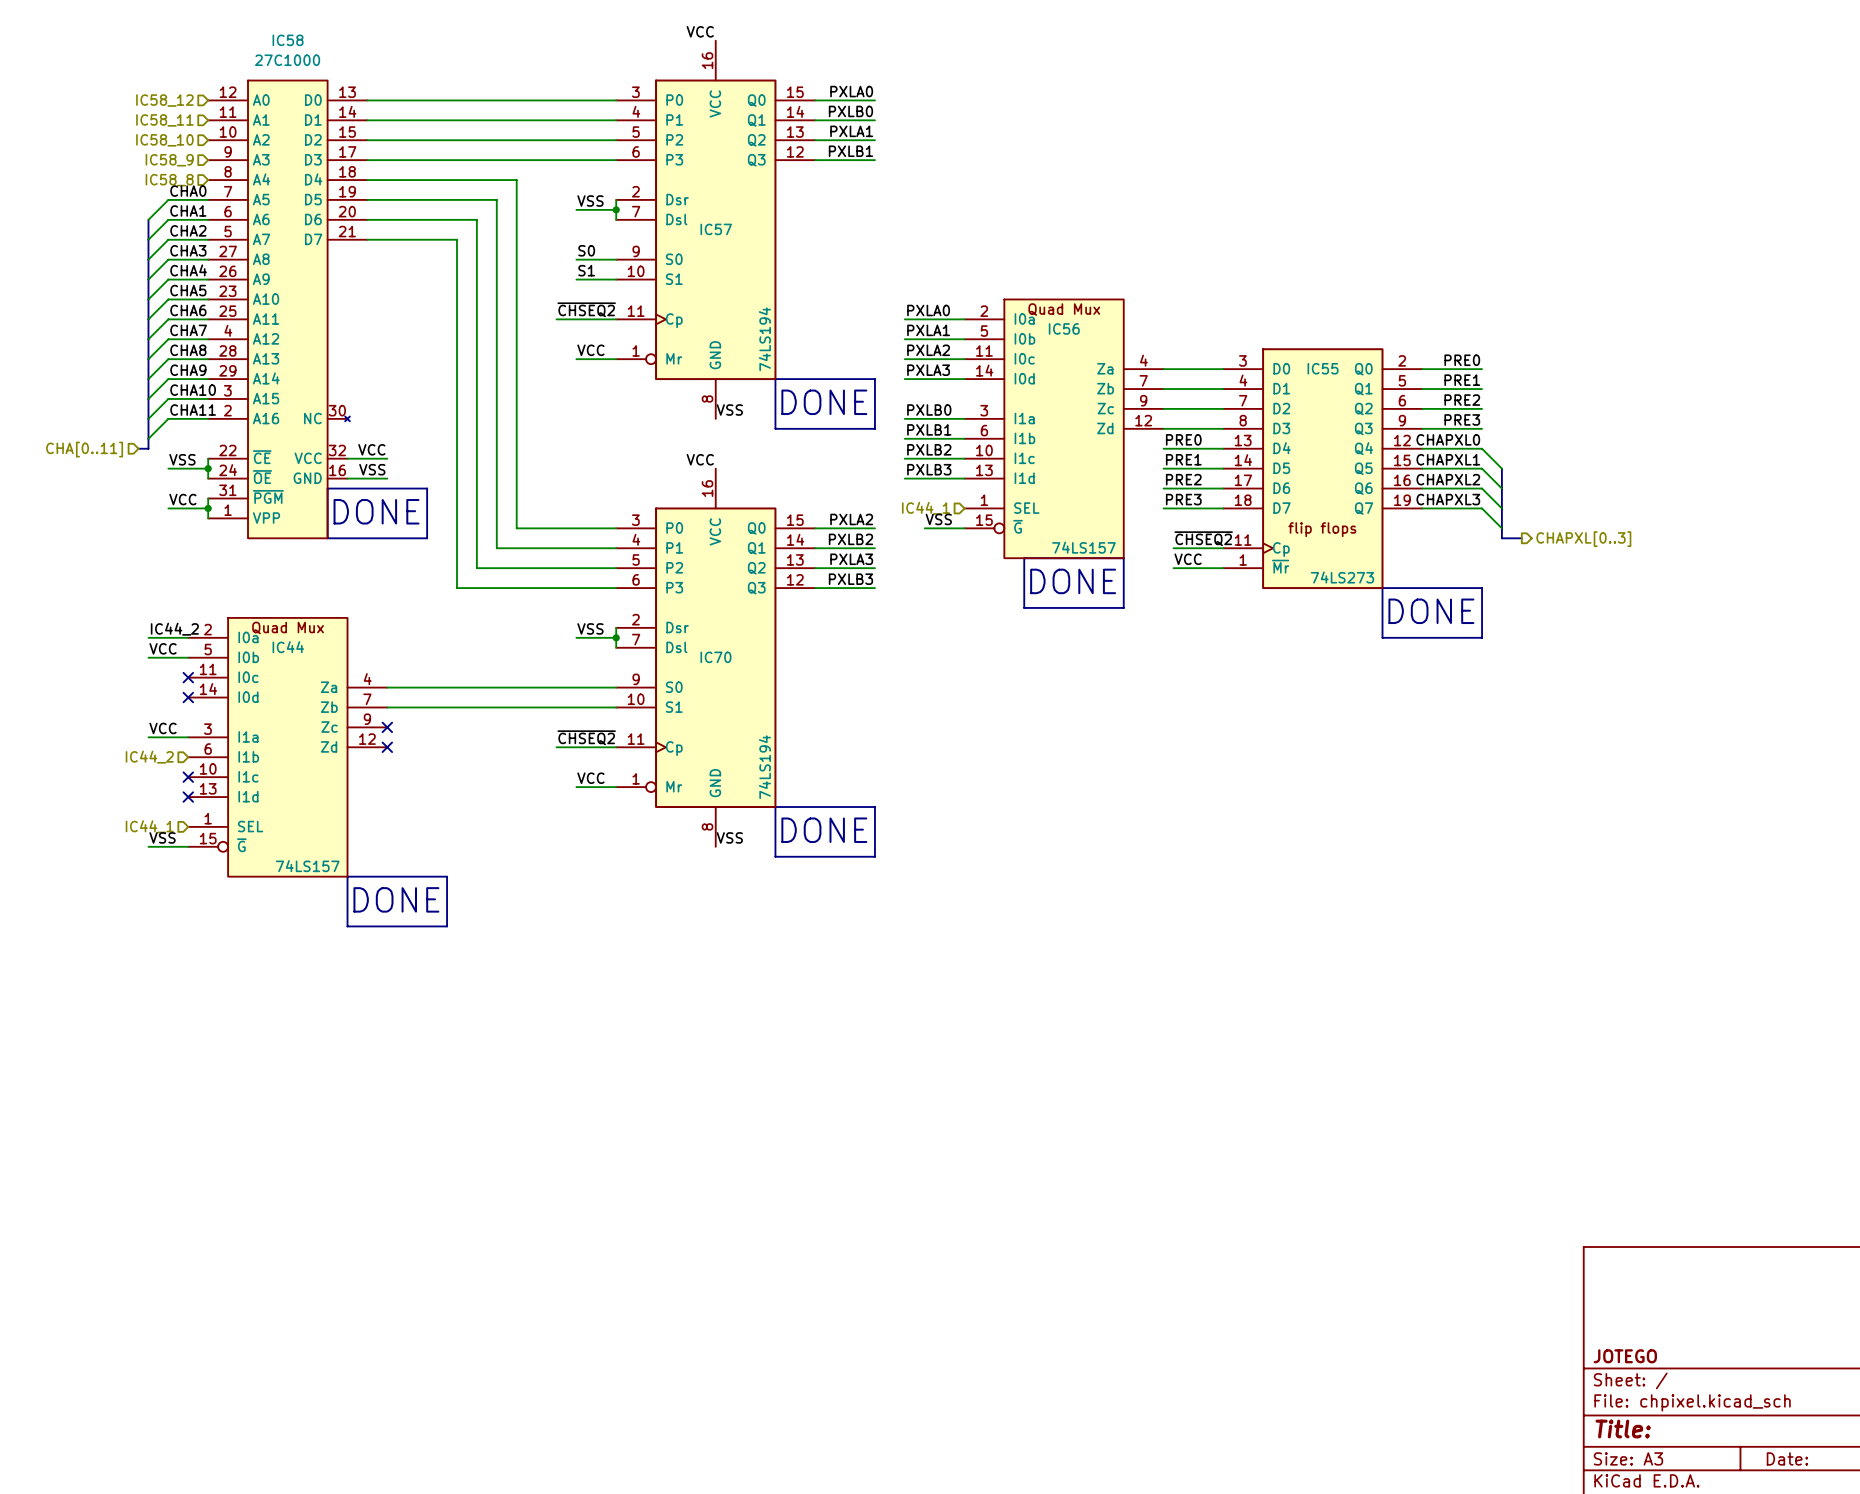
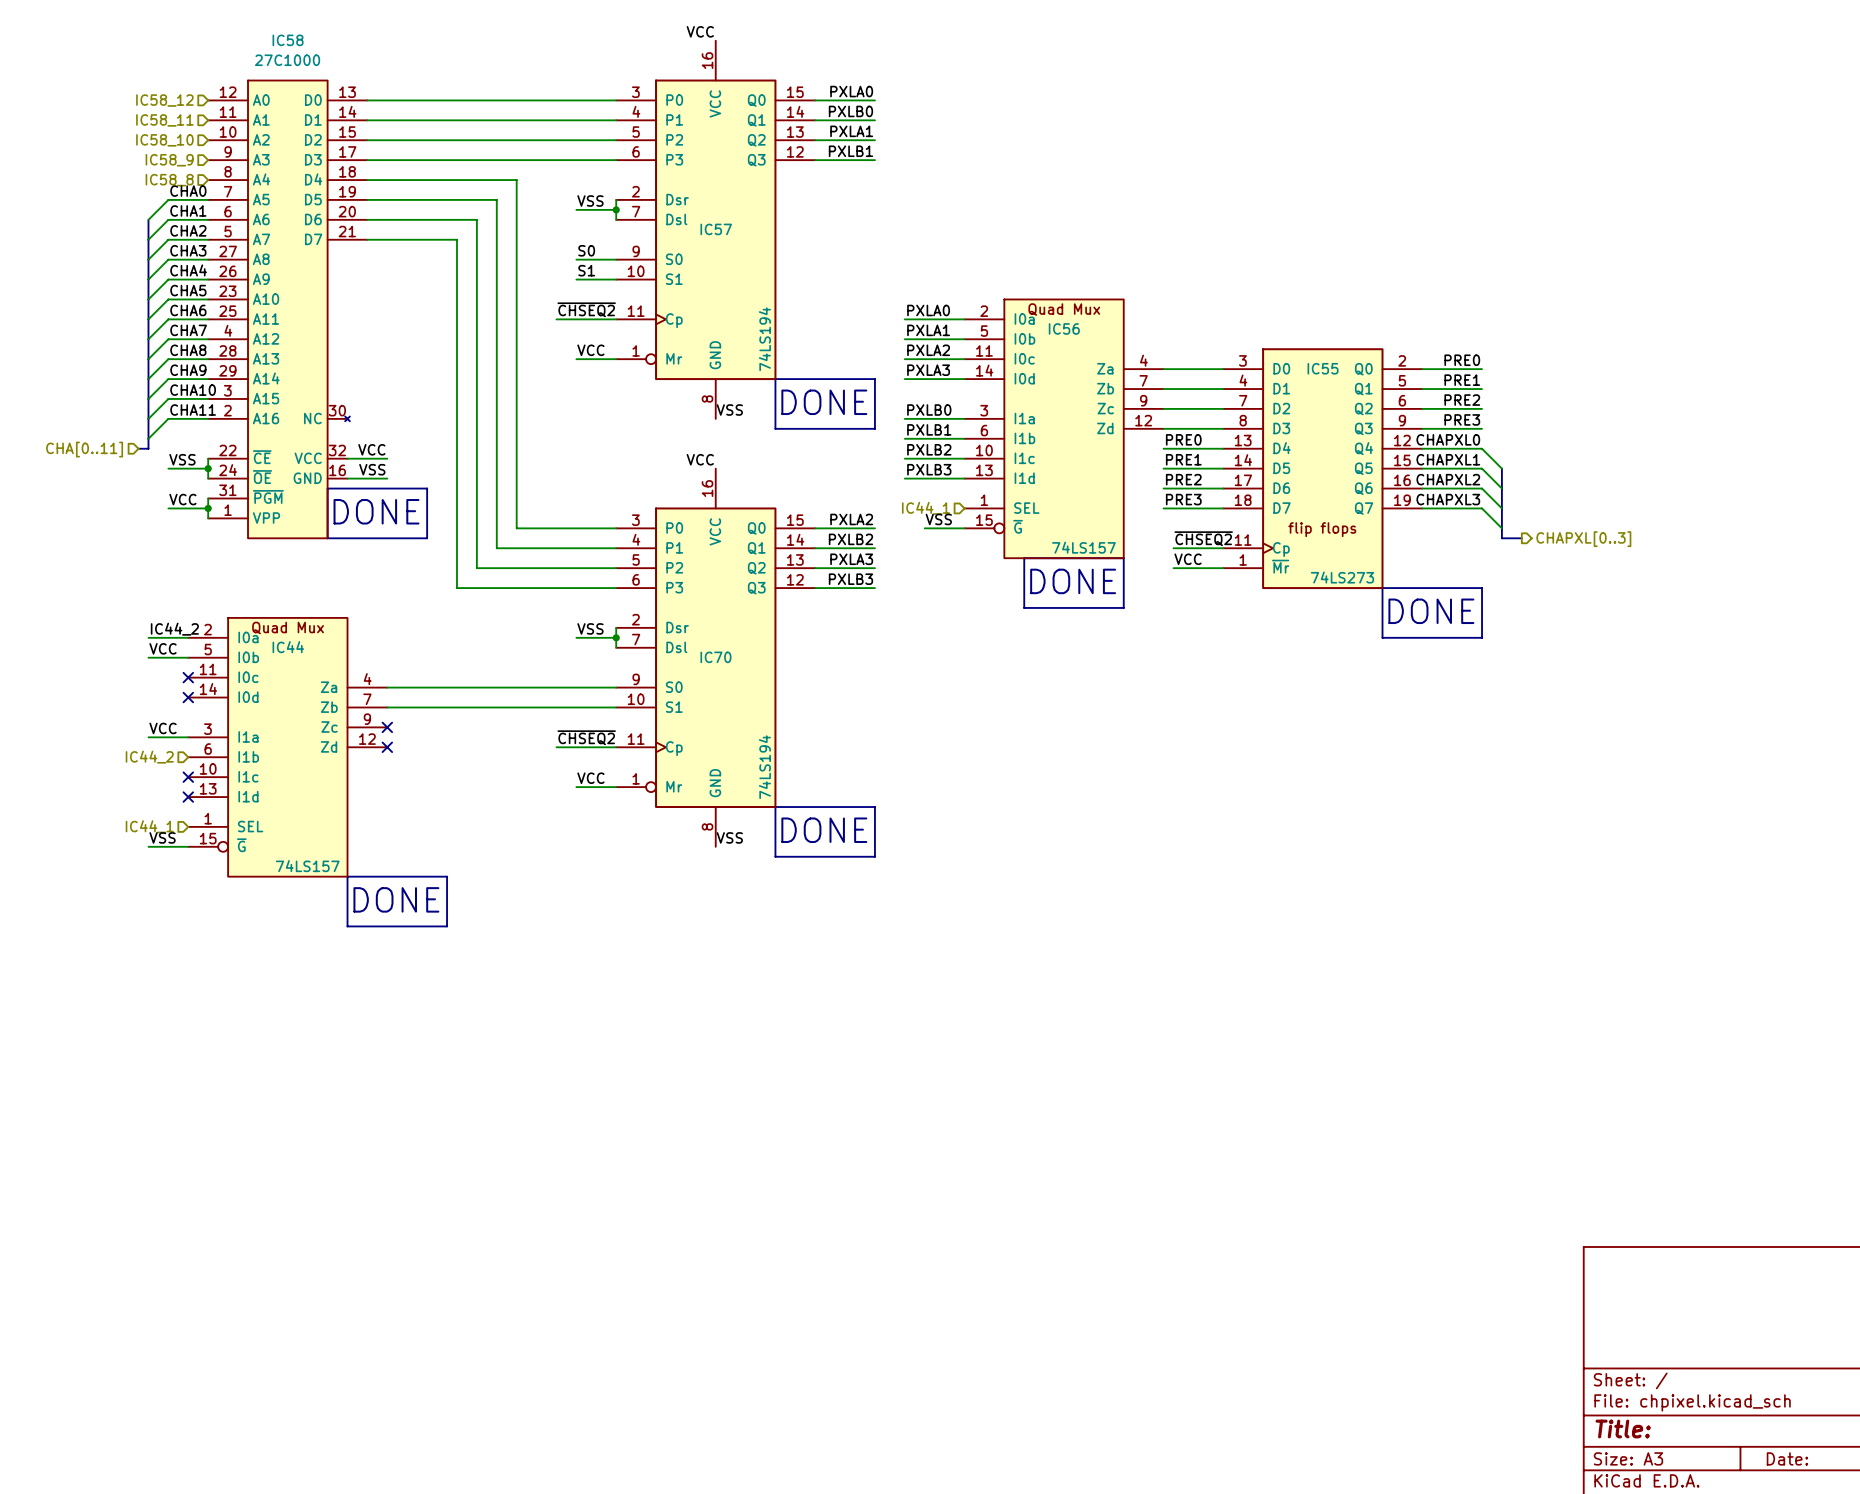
title block: JOTEGO (1625, 1356) -> none

